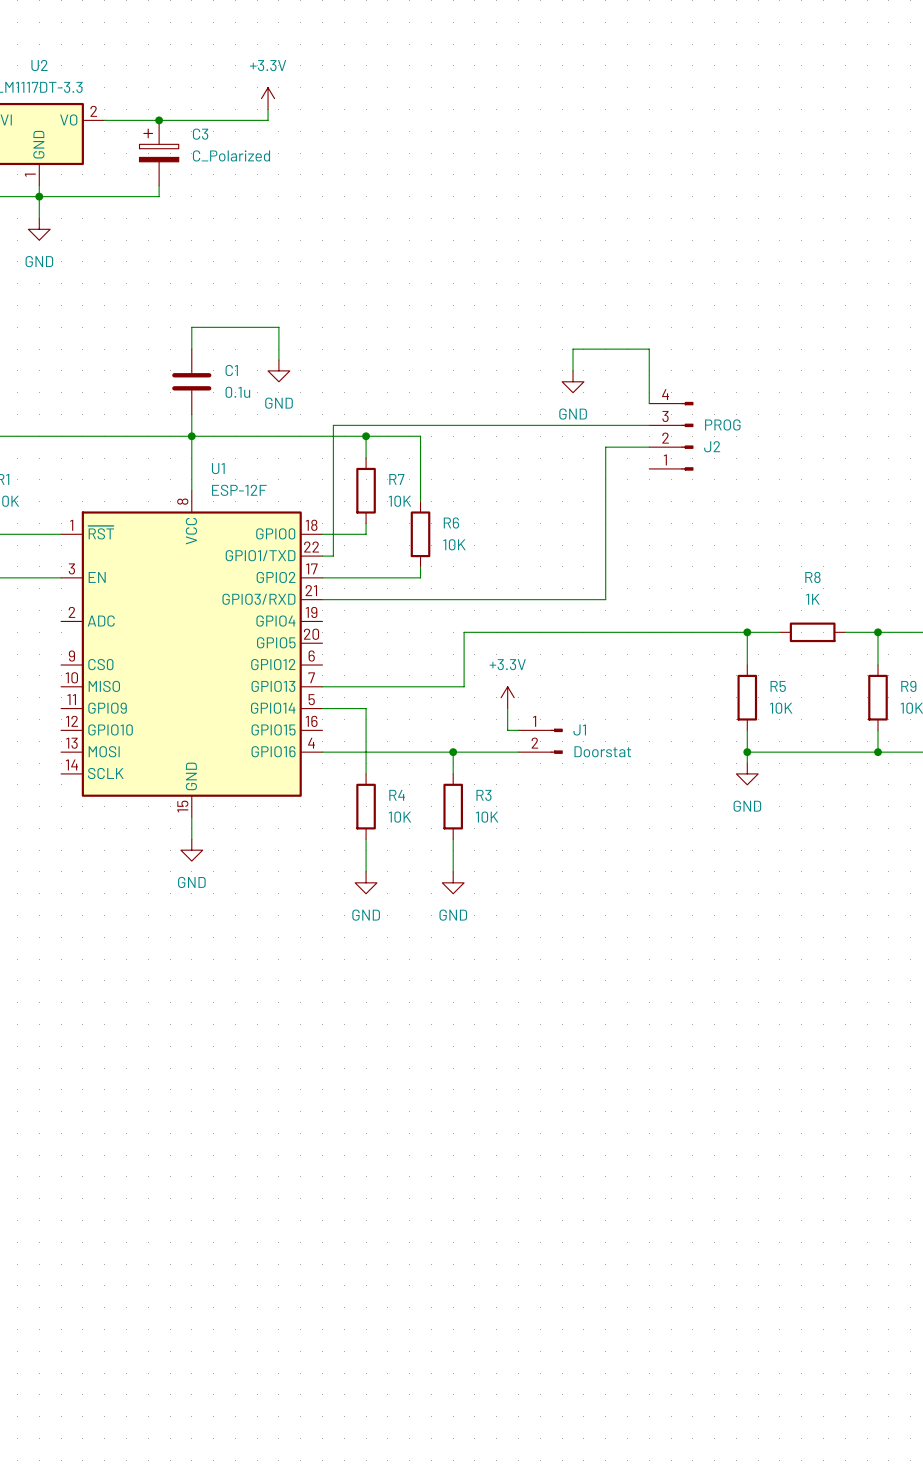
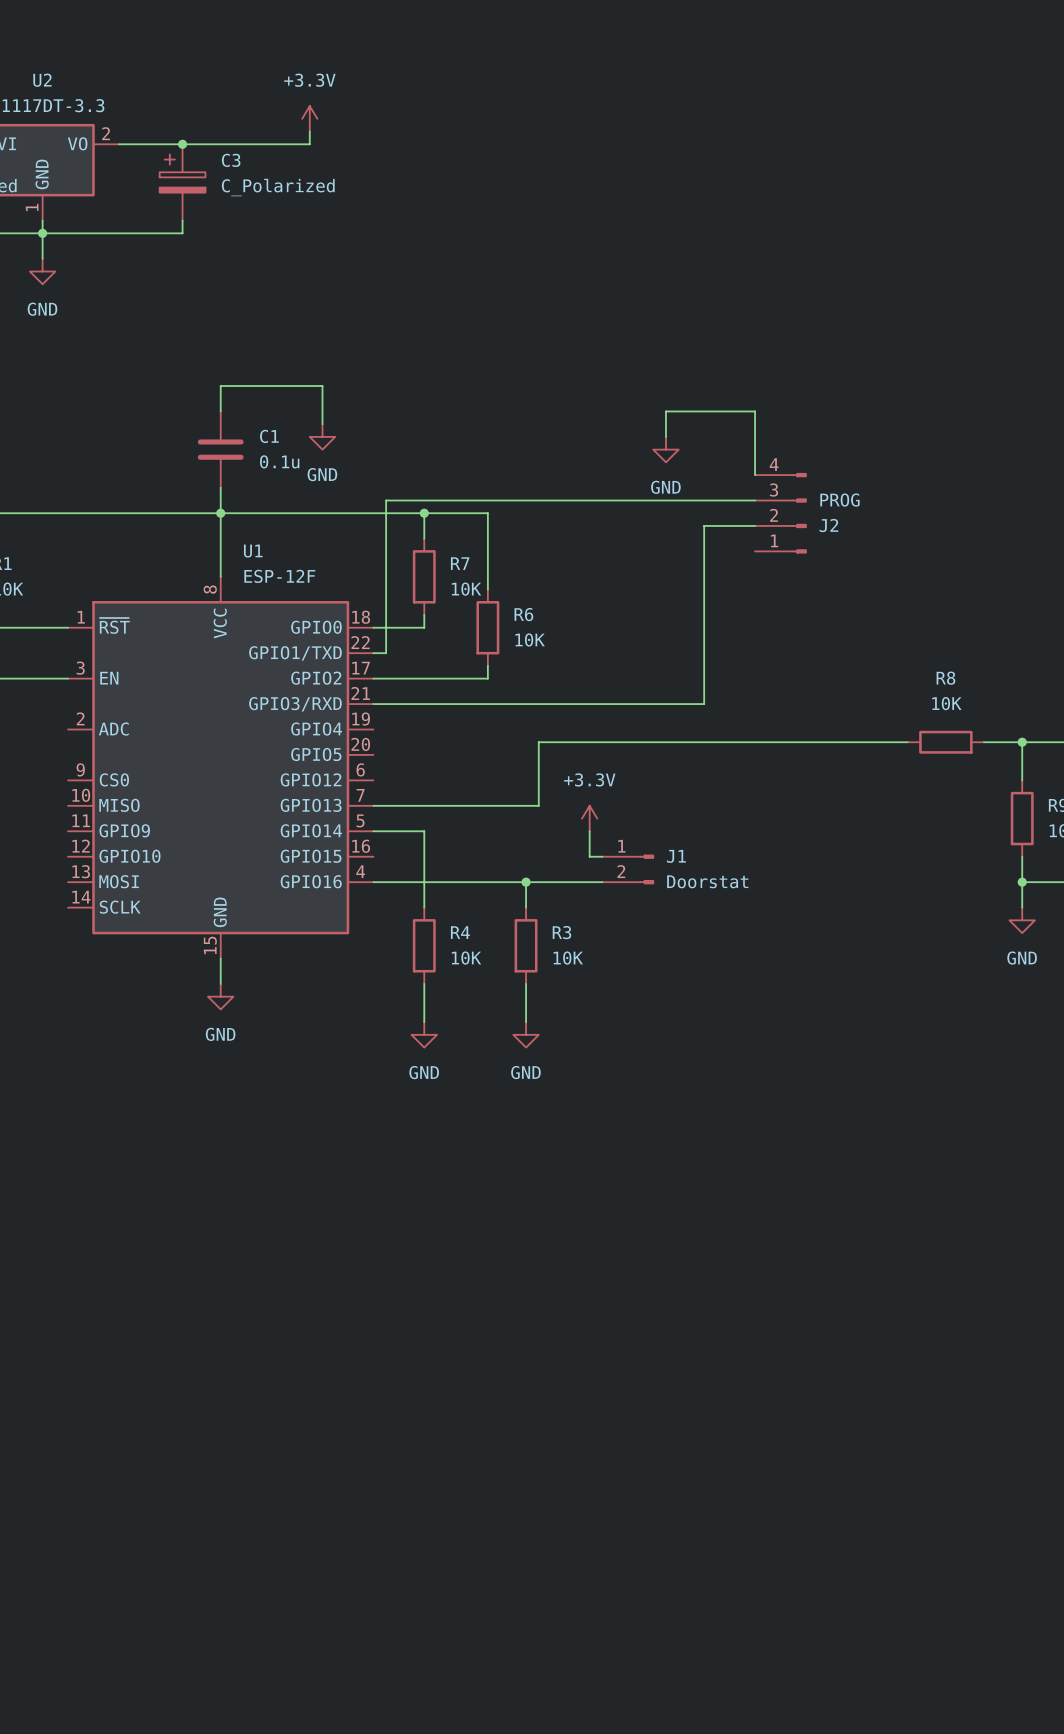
R8 value: 1K (812, 599) -> 10K (946, 703)
wire: (747, 632) (747, 665) -> none
junction: (747, 632) -> none
R5: 10K (747, 697) -> none
wire: (747, 730) (747, 763) -> none
wire: (747, 752) (878, 752) -> (1022, 907) (1022, 882)
junction: (747, 752) -> none
power symbol position: GND (747, 773) -> GND (1022, 920)

